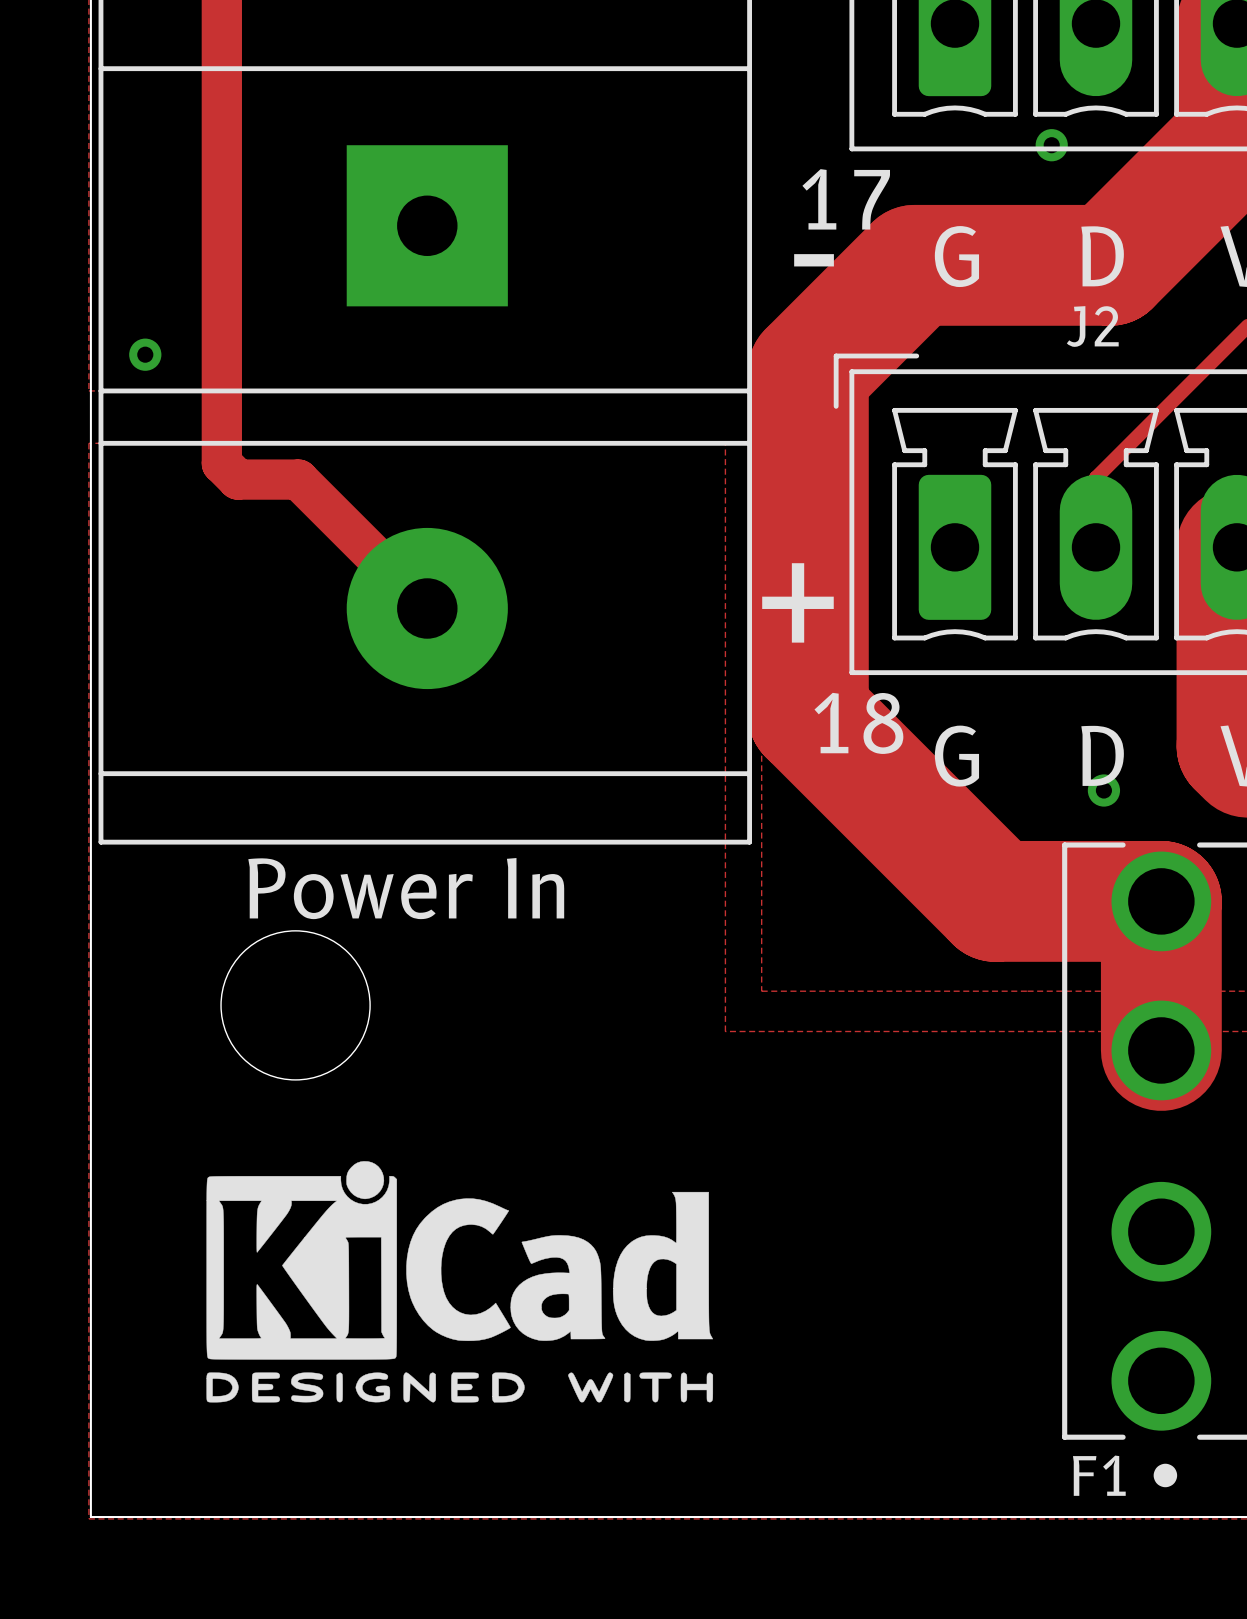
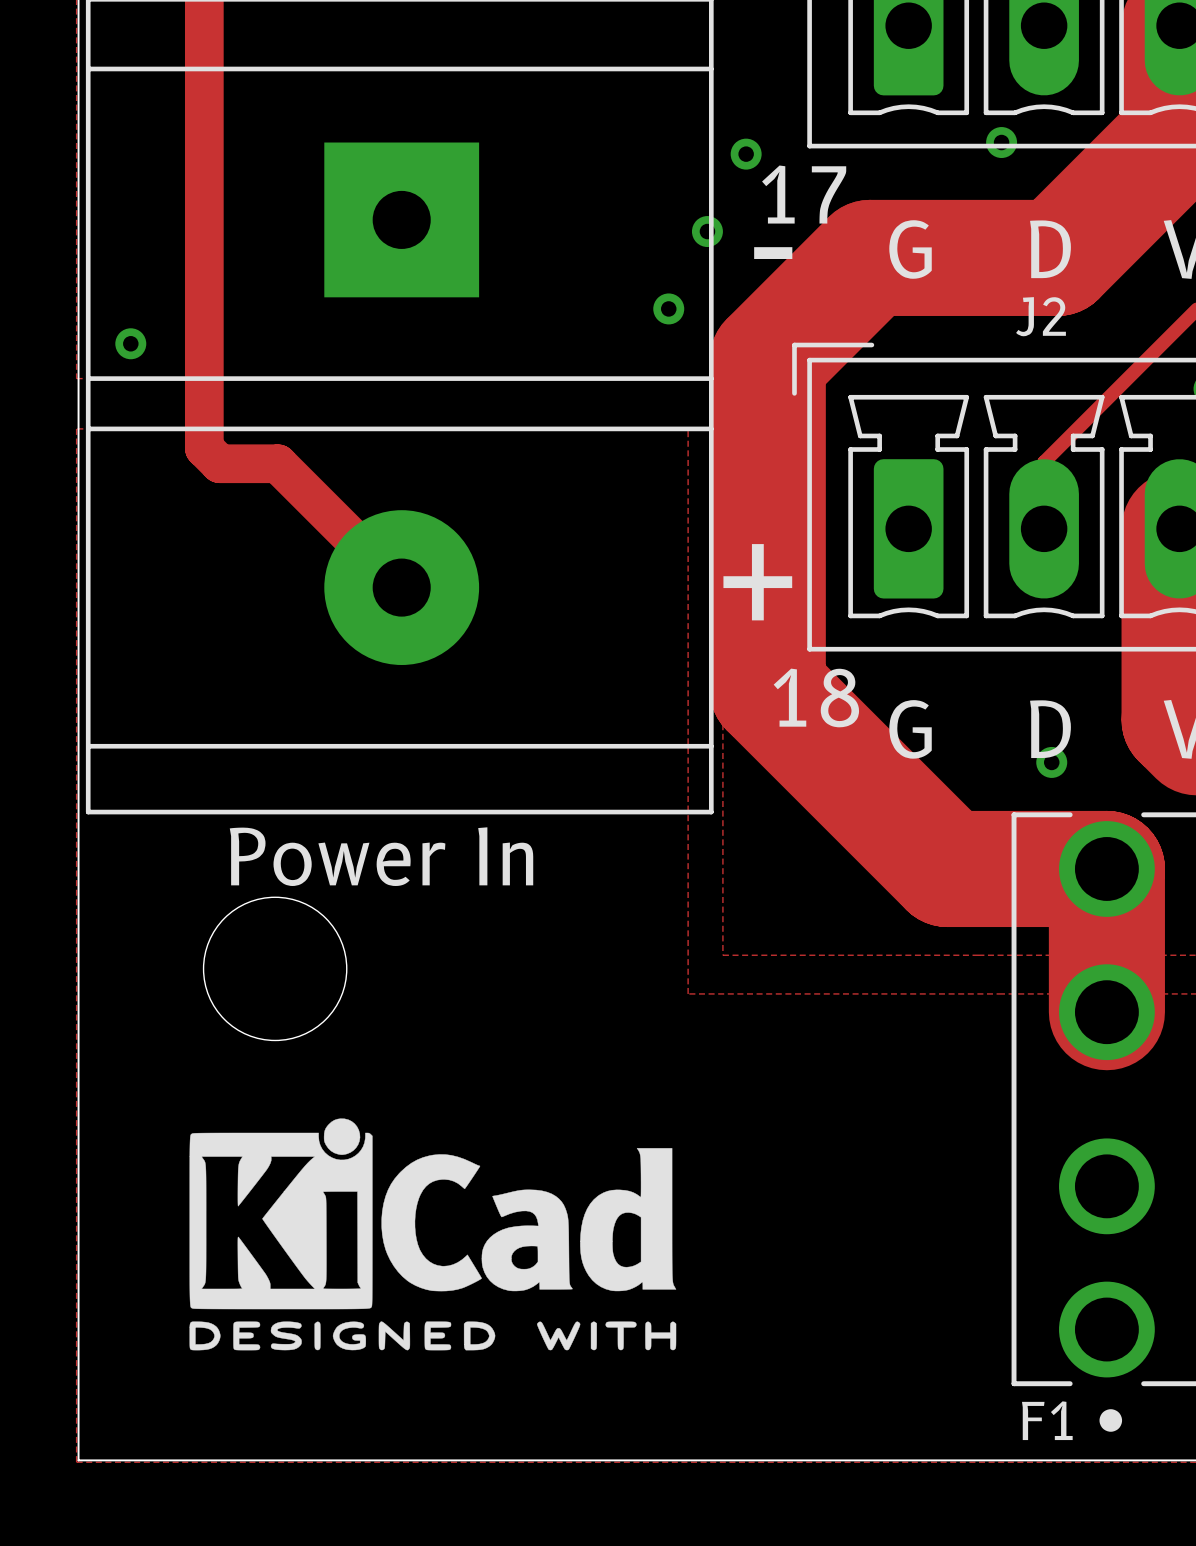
via: none -> (746, 154)
via: none -> (707, 231)
via: none -> (668, 308)

